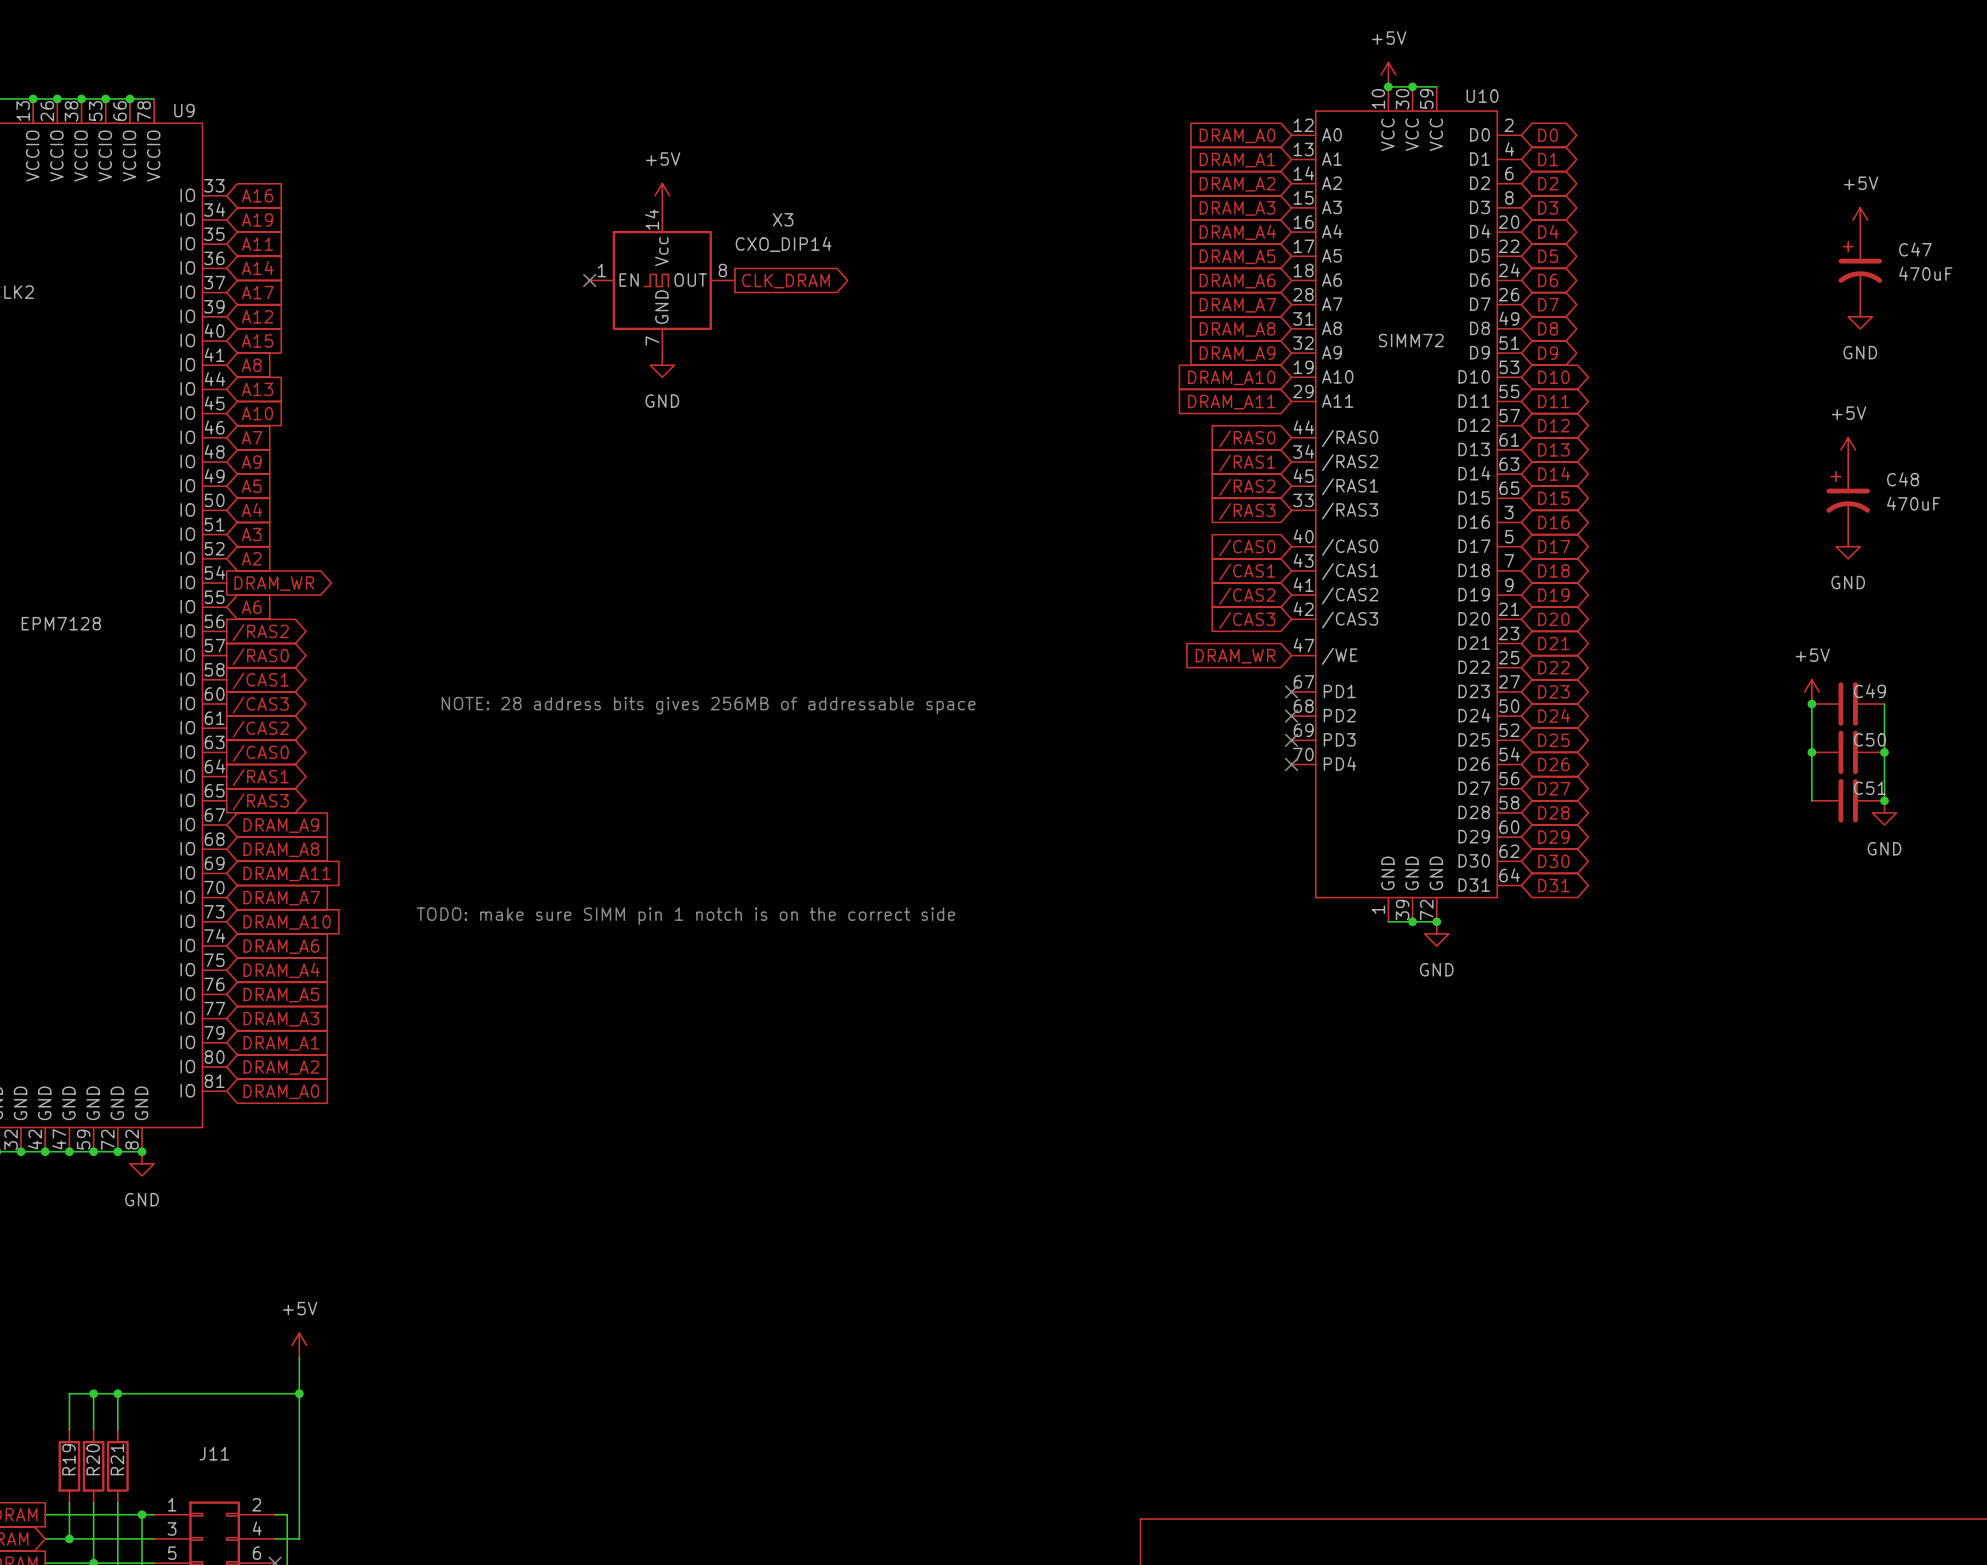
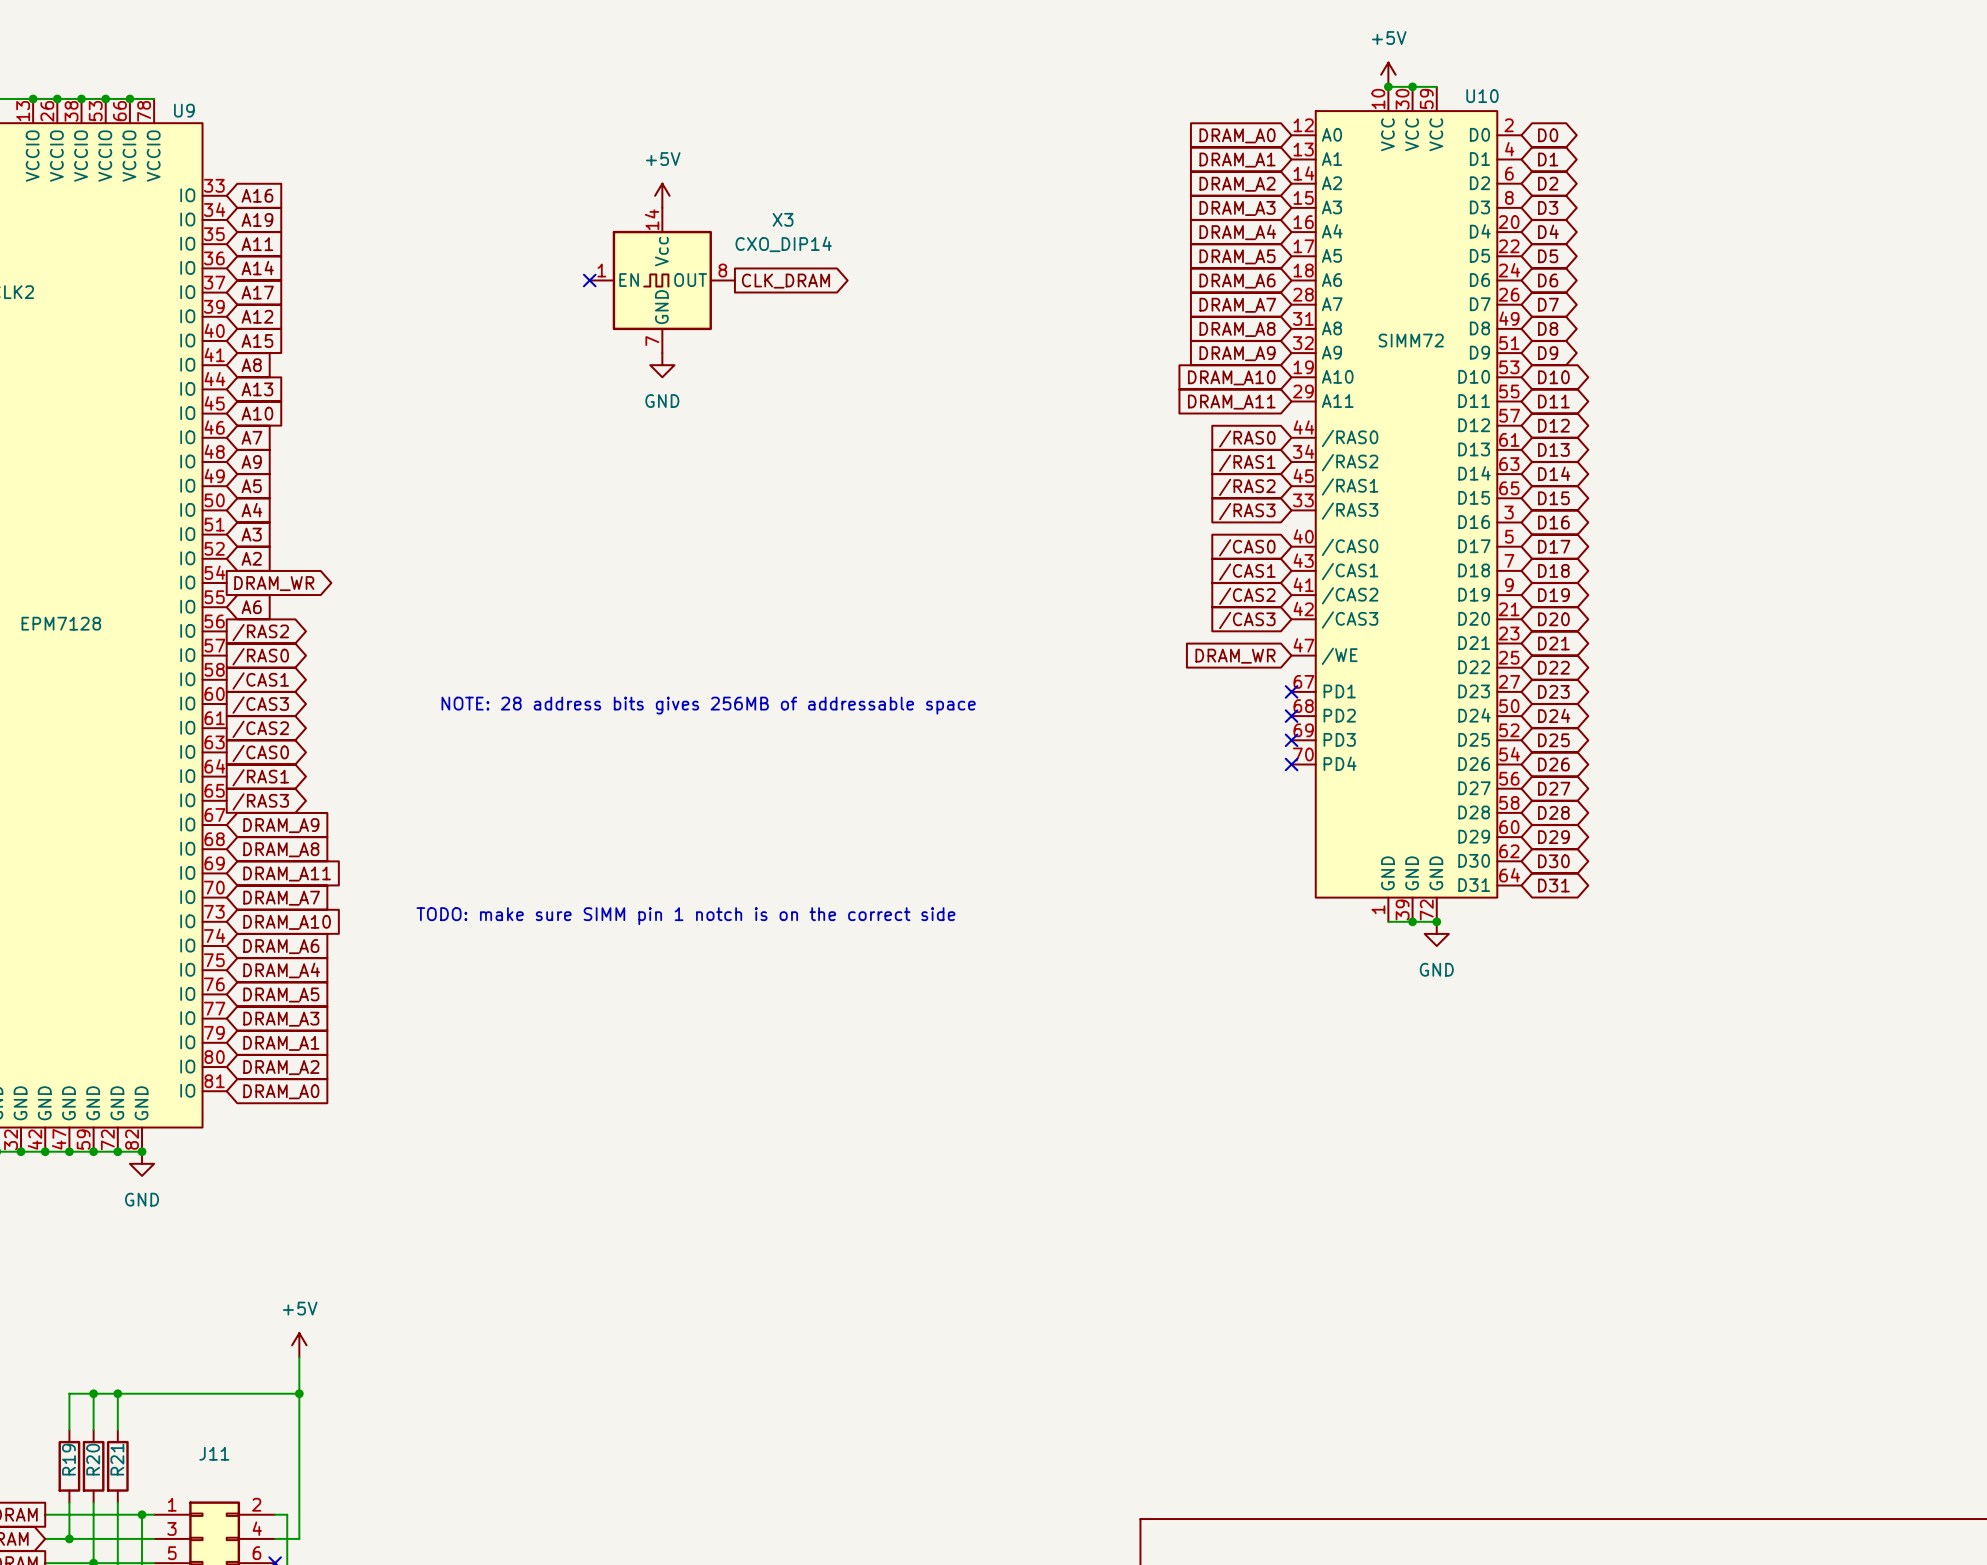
power symbol: +5V (1860, 219) -> none
C47: 470uF (1860, 268) -> none
power symbol: GND (1860, 316) -> none
power symbol: +5V (1848, 449) -> none
C48: 470uF (1848, 498) -> none
power symbol: GND (1848, 546) -> none
power symbol: +5V (1811, 691) -> none
wire: (1811, 704) (1811, 800) -> none
junction: (1811, 704) -> none
C49: (1848, 704) -> none
wire: (1884, 704) (1884, 800) -> none
junction: (1811, 752) -> none
C50: (1848, 752) -> none
junction: (1884, 752) -> none
C51: (1848, 800) -> none
junction: (1884, 800) -> none
power symbol: GND (1884, 812) -> none

